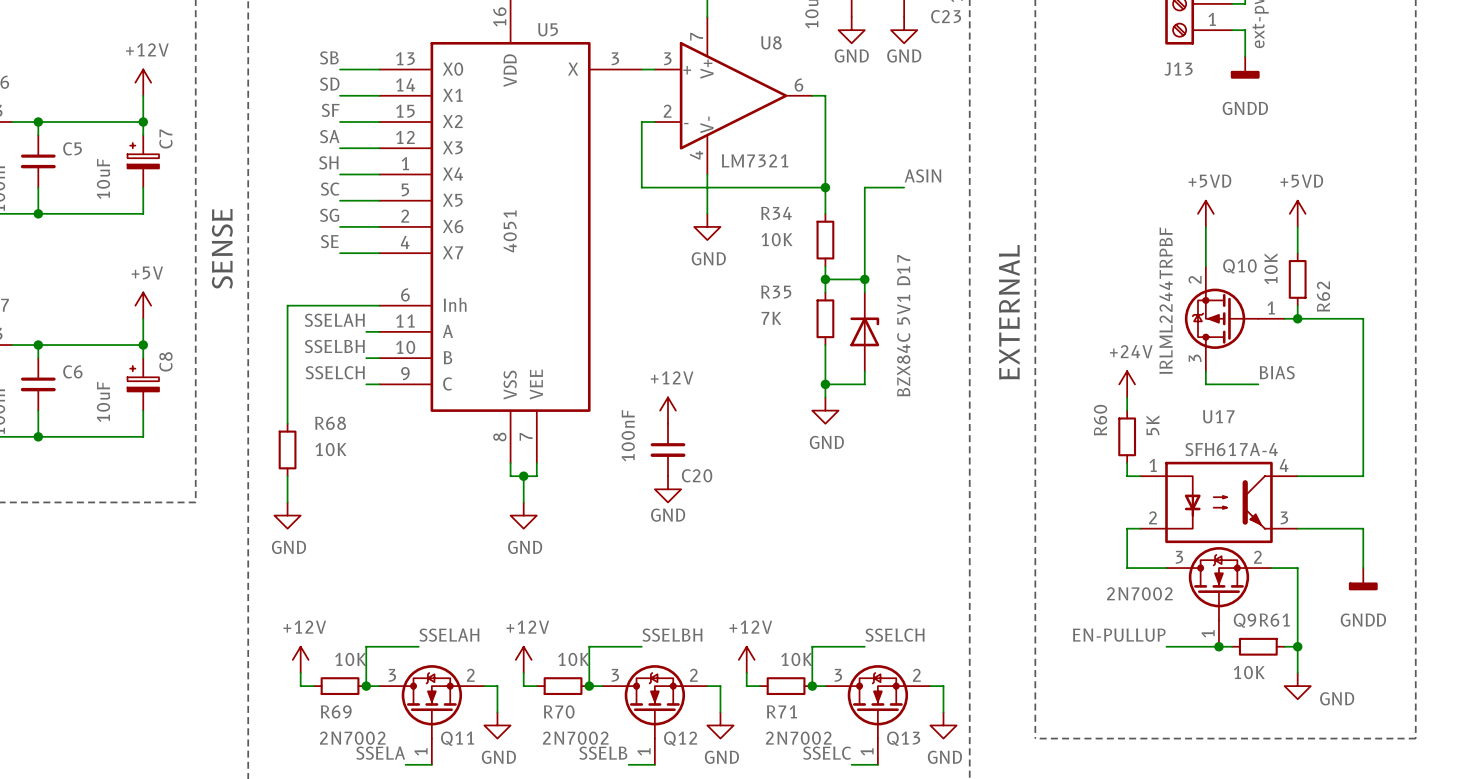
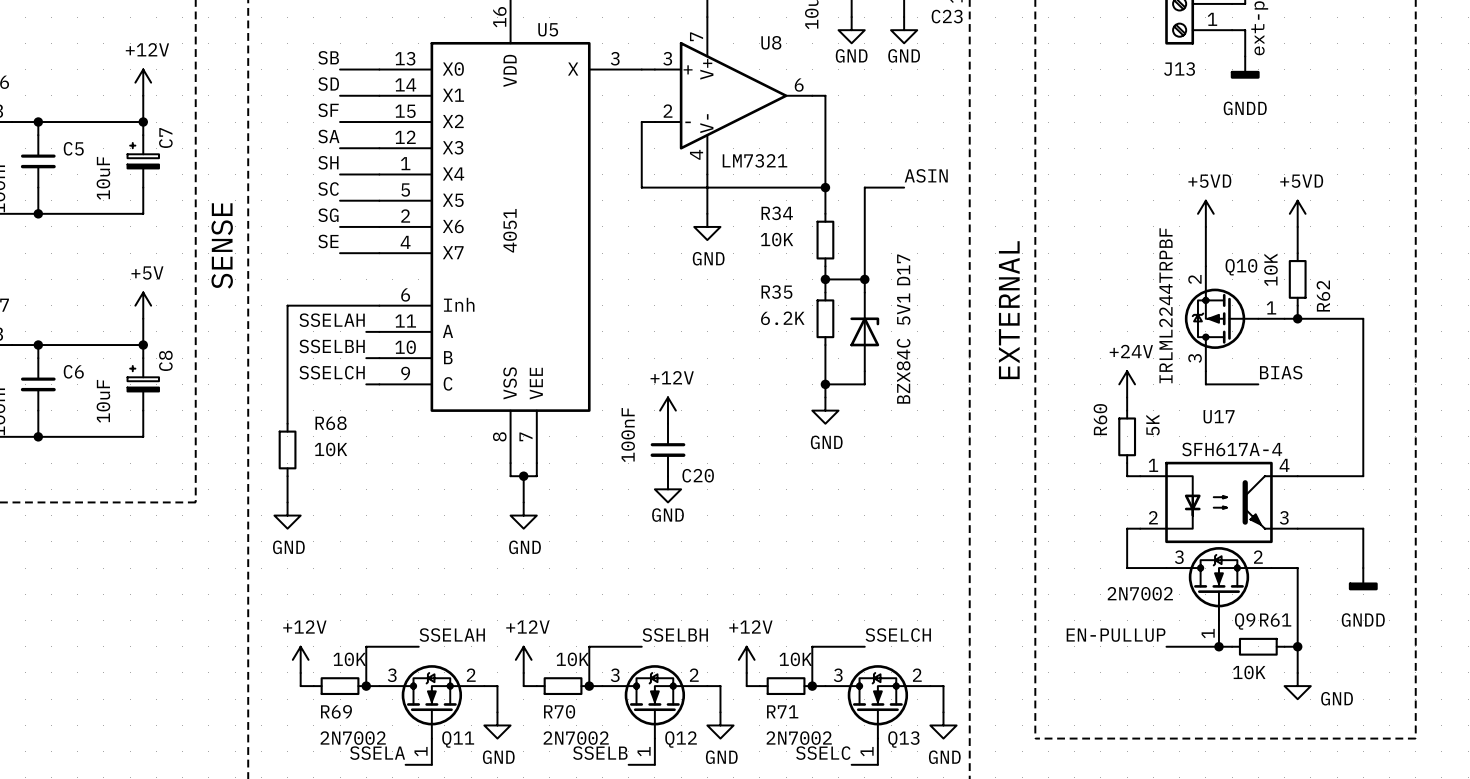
R35 value: 7K (771, 318) -> 6.2K (782, 318)

